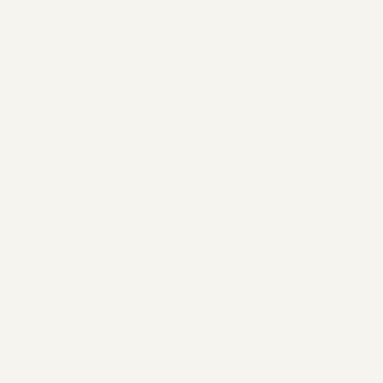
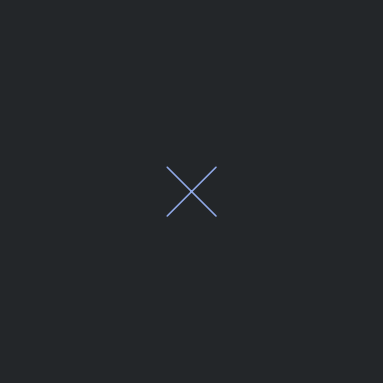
no-connect mark: none -> (191, 191)

